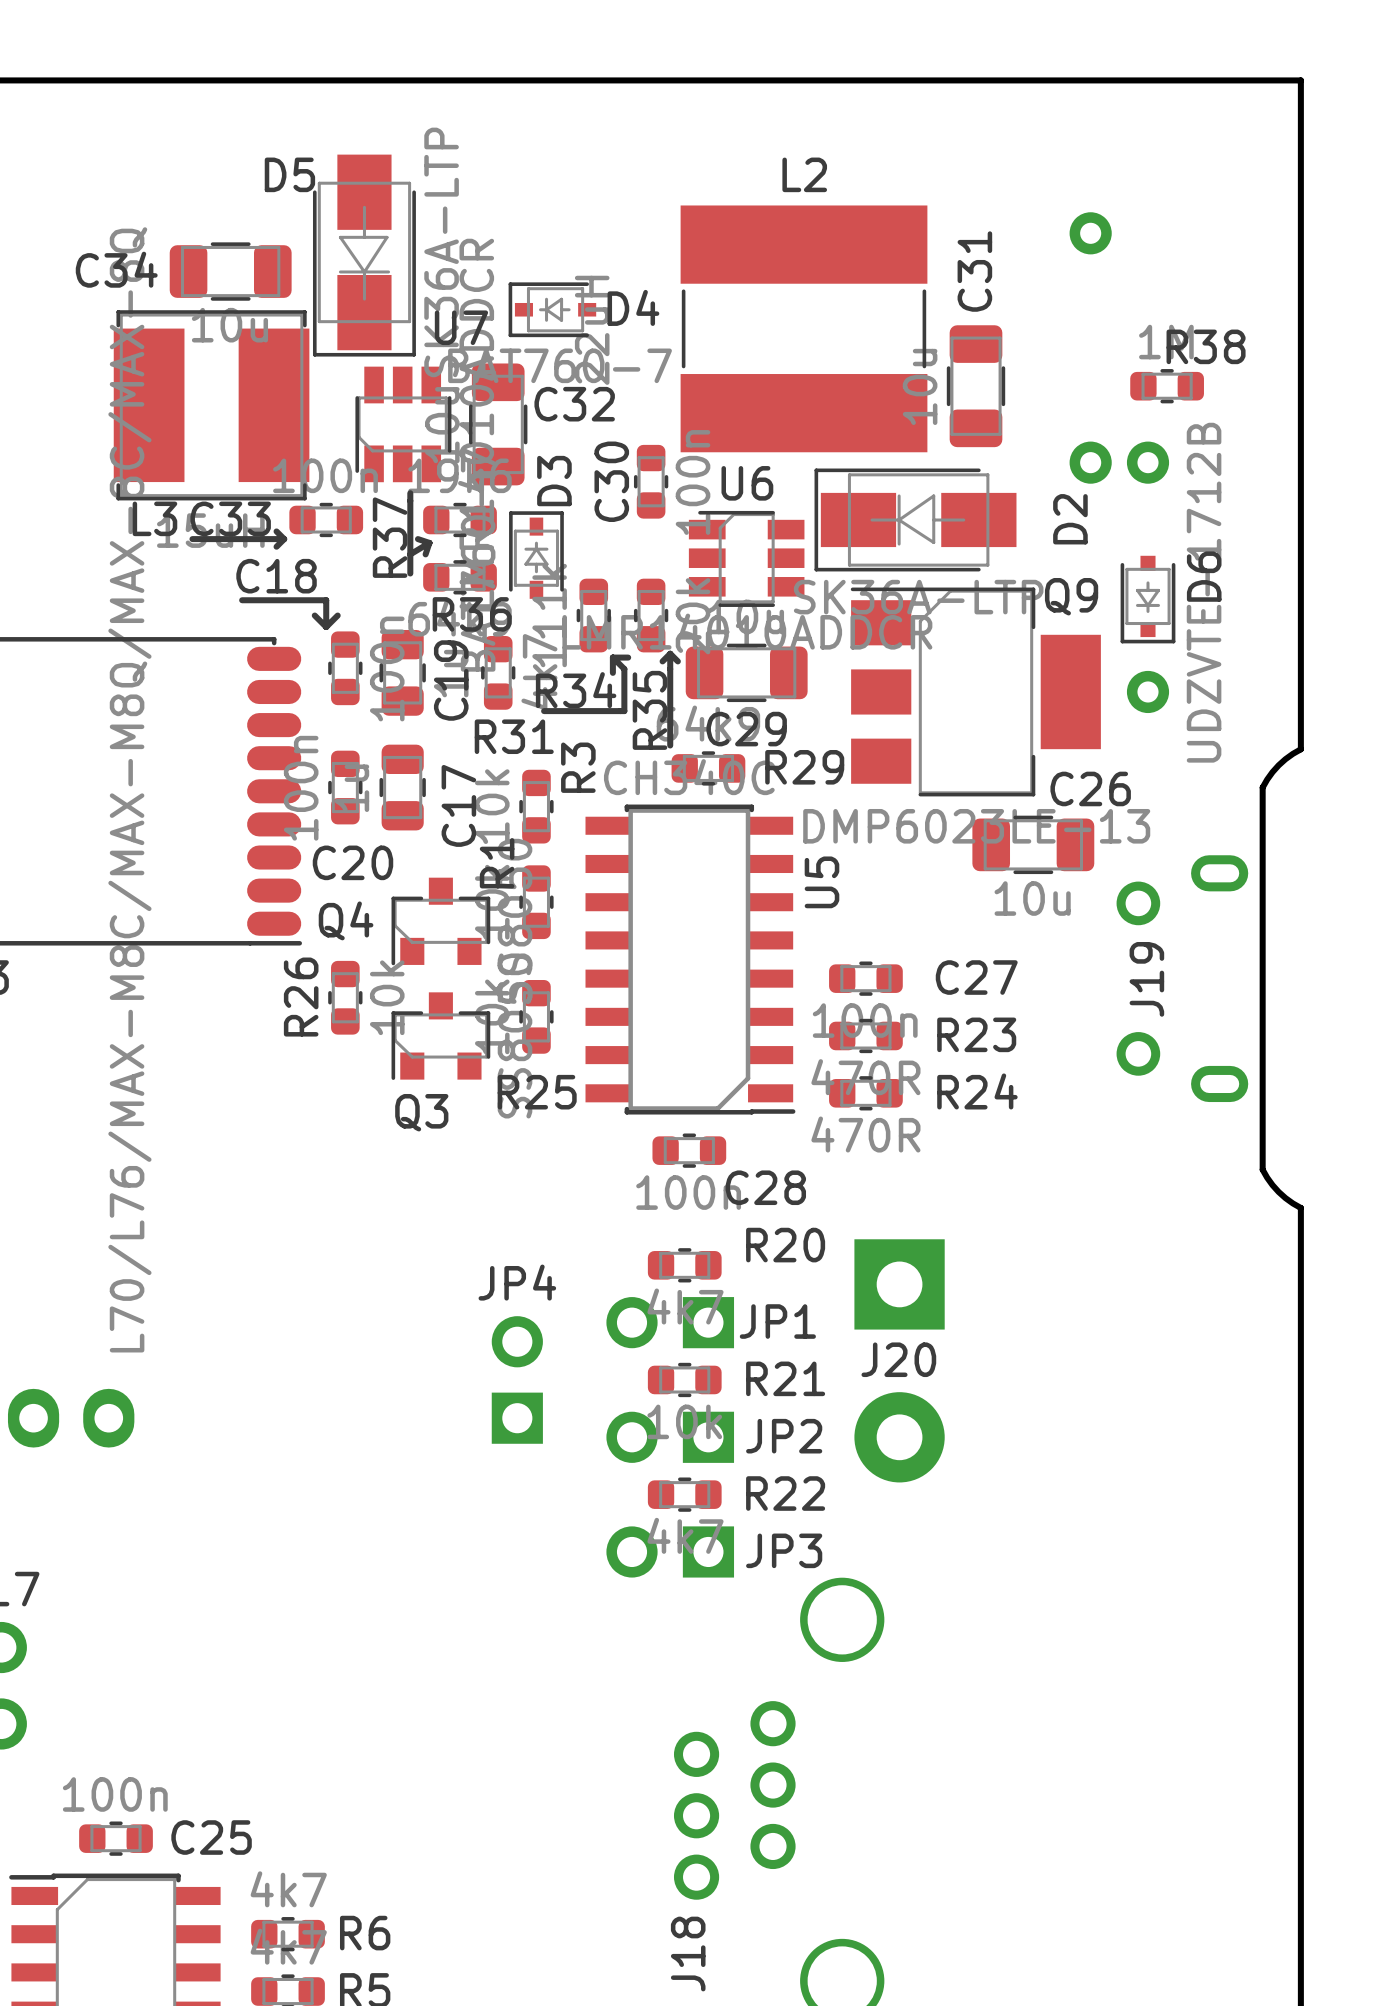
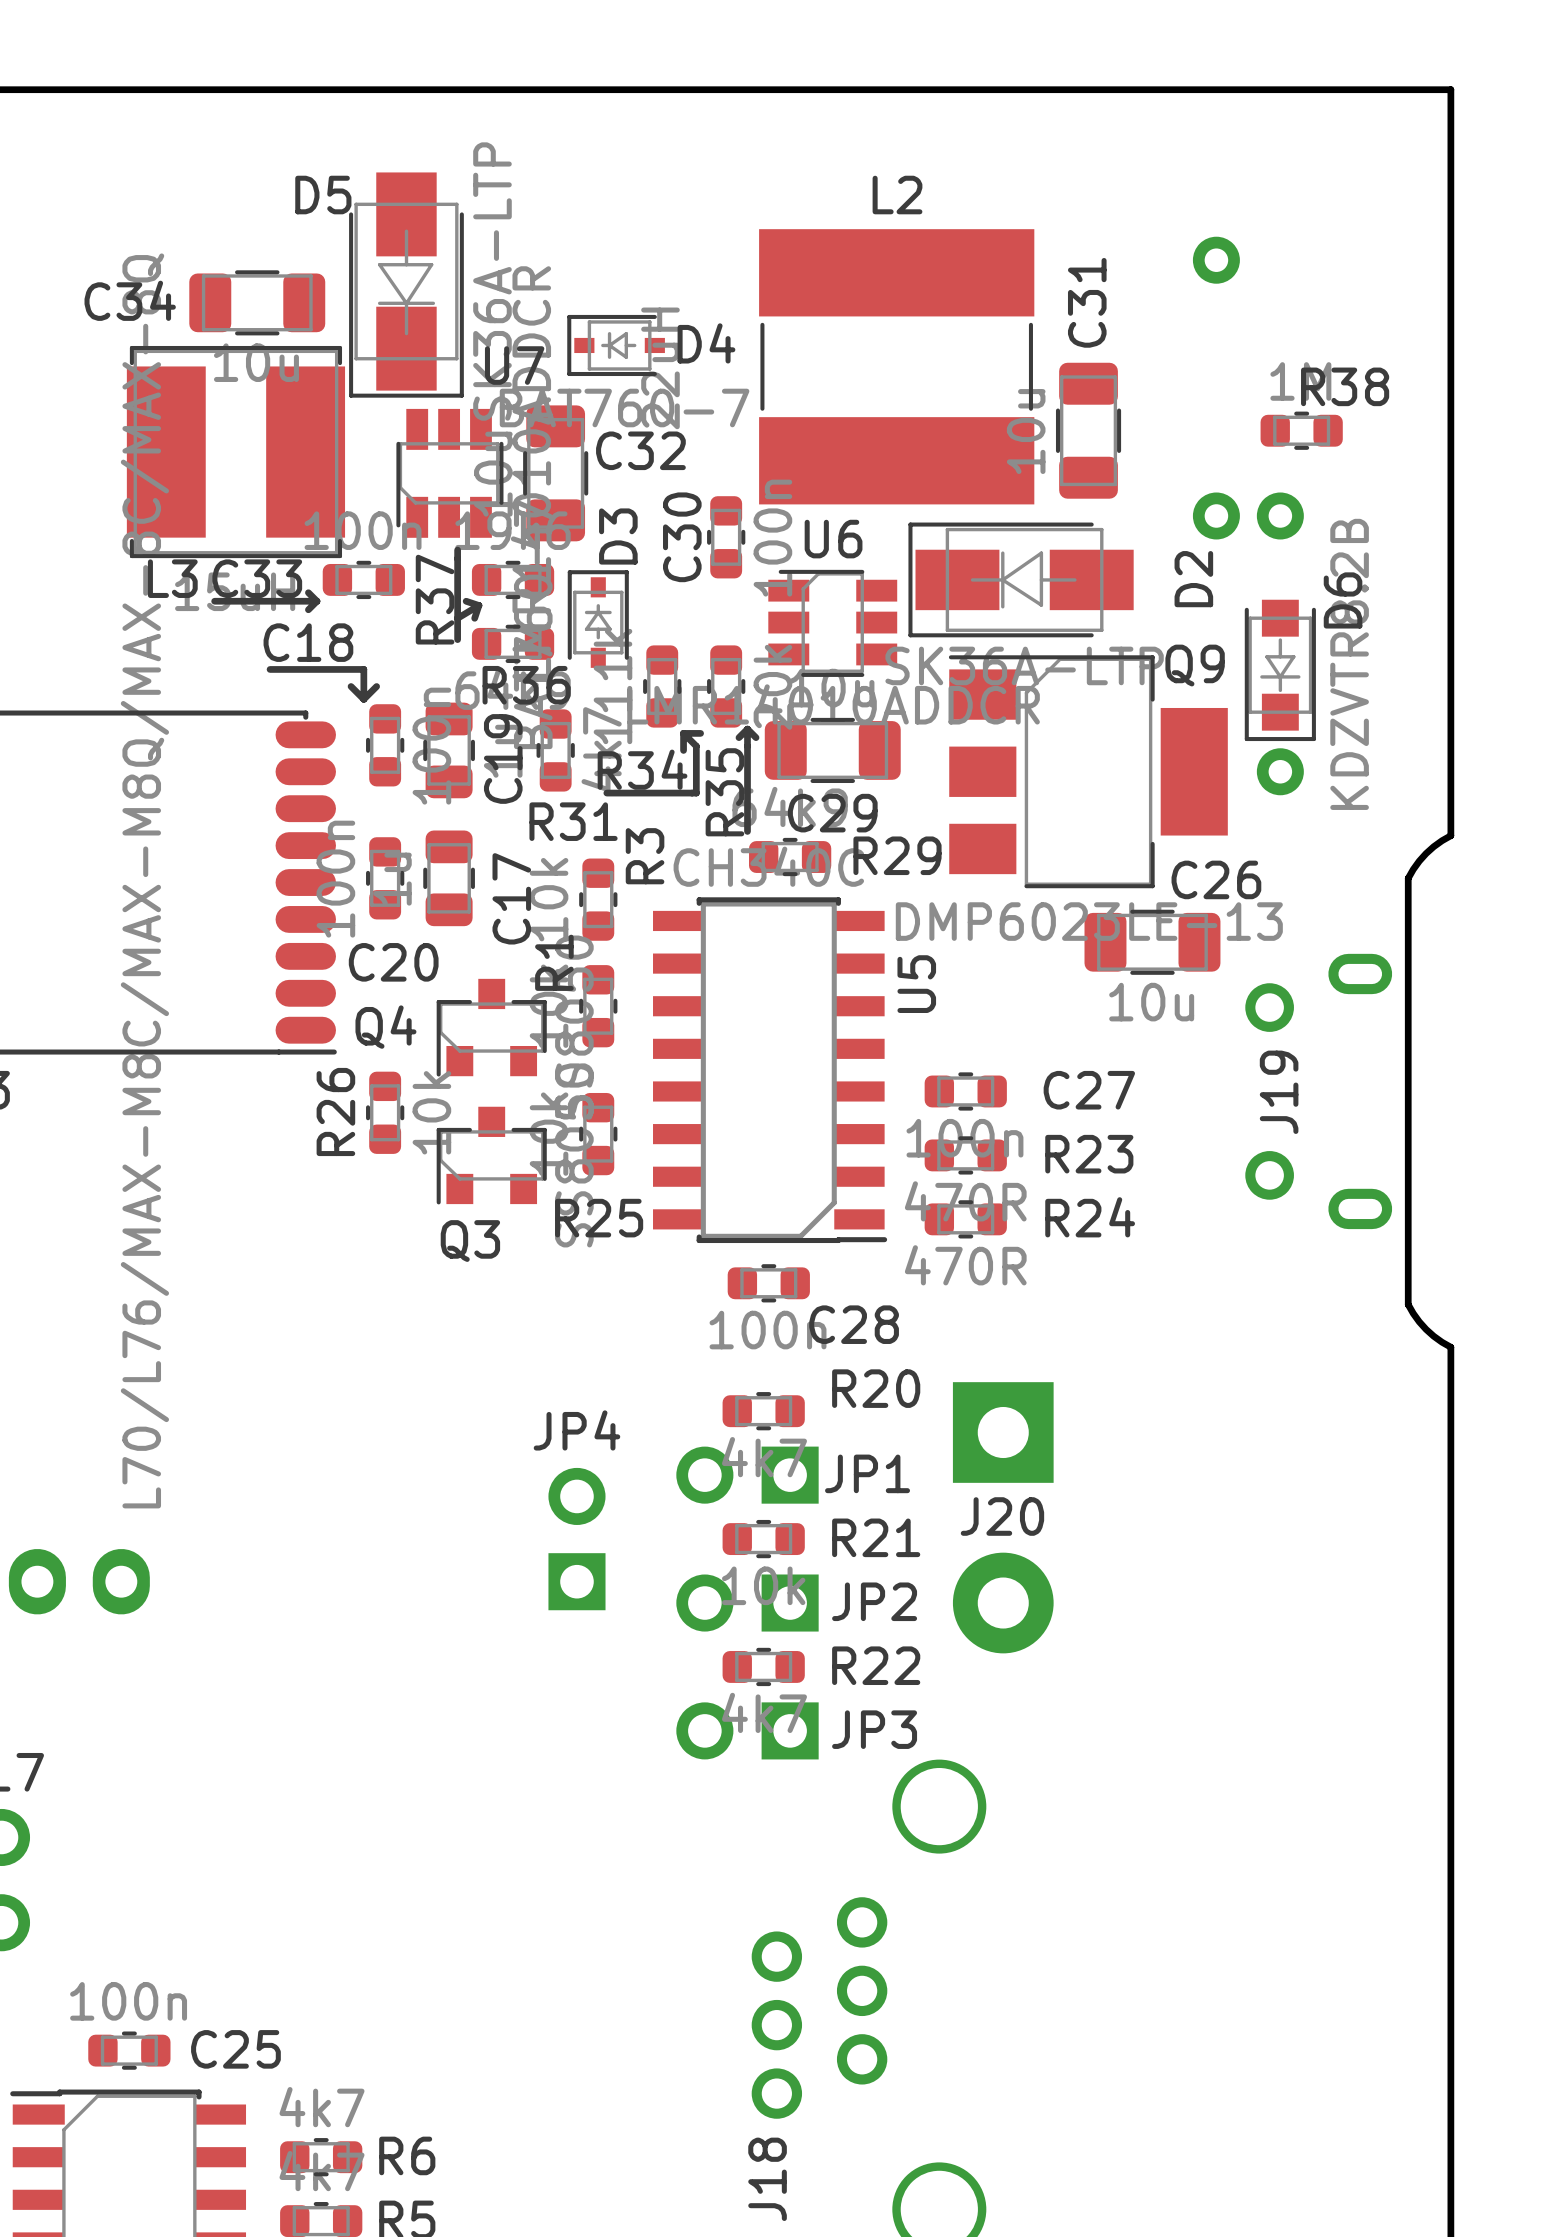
D6 footprint: [1120, 555, 1176, 644] -> [1244, 599, 1316, 742]
D6 name position: D6 (1204, 576) -> D6 (1343, 600)
D6 value: UDZVTE-1712B (1204, 592) -> KDZVTR8.2B (1349, 664)

